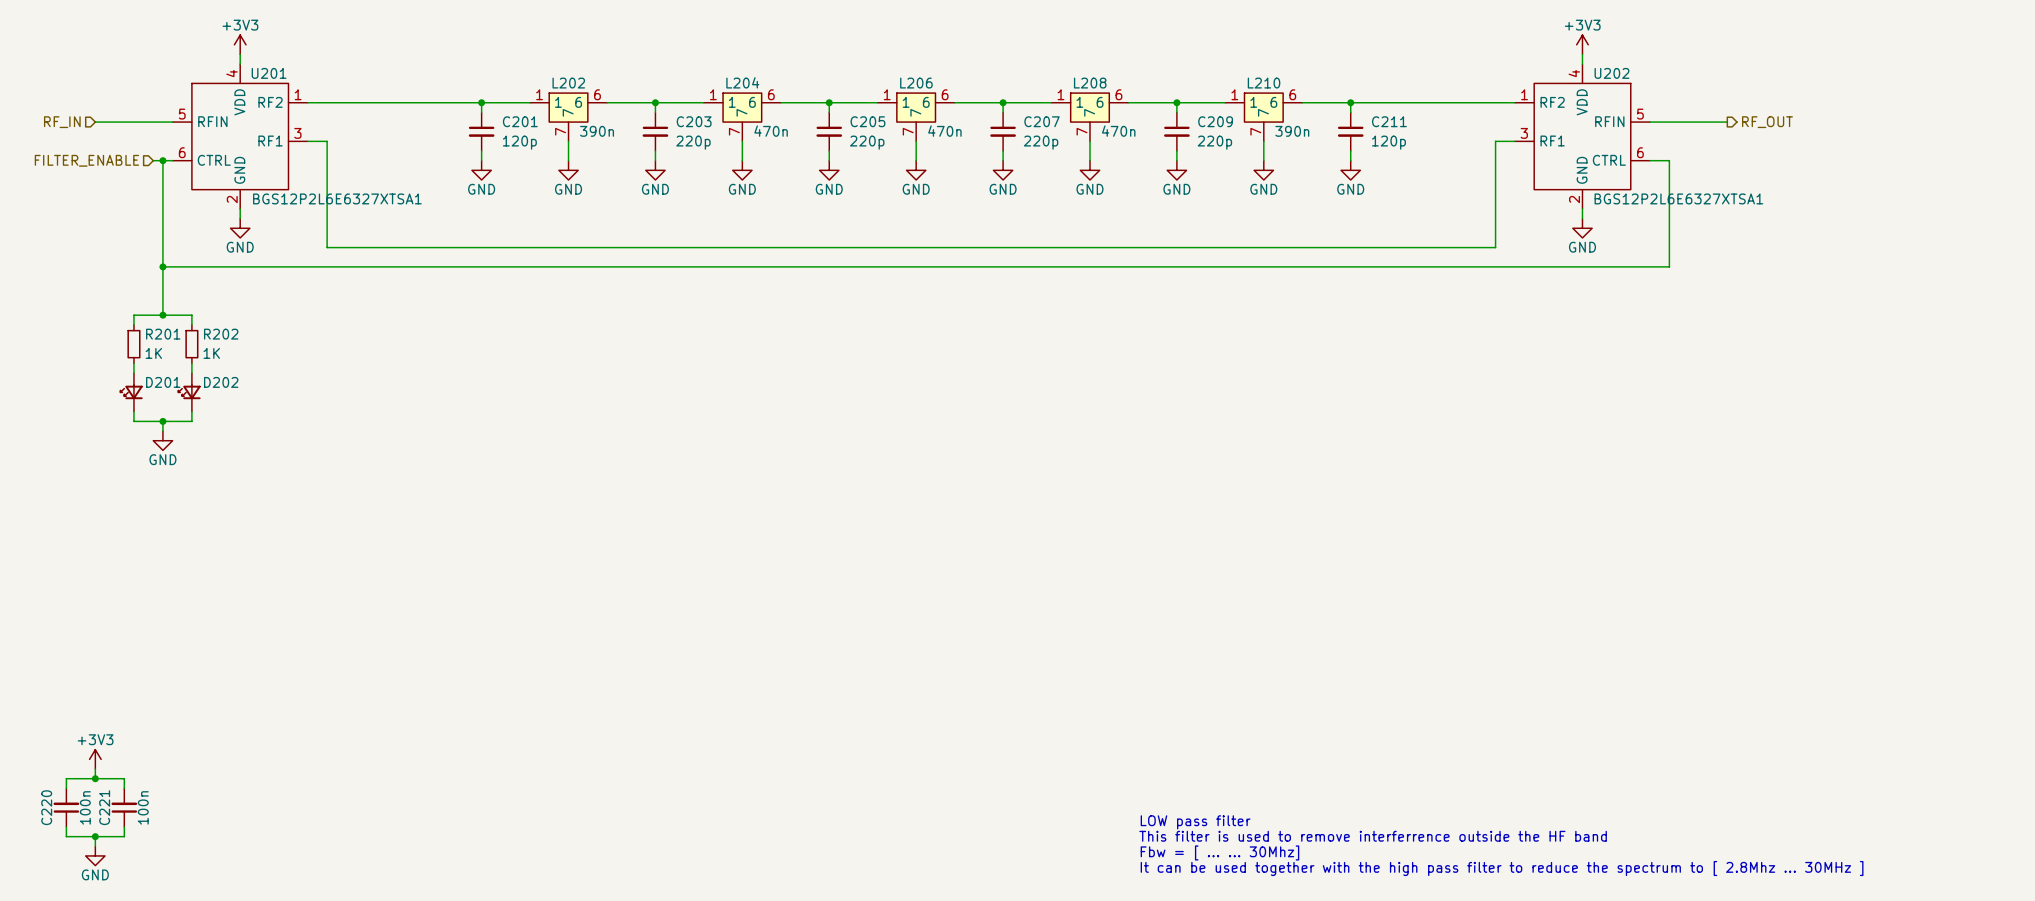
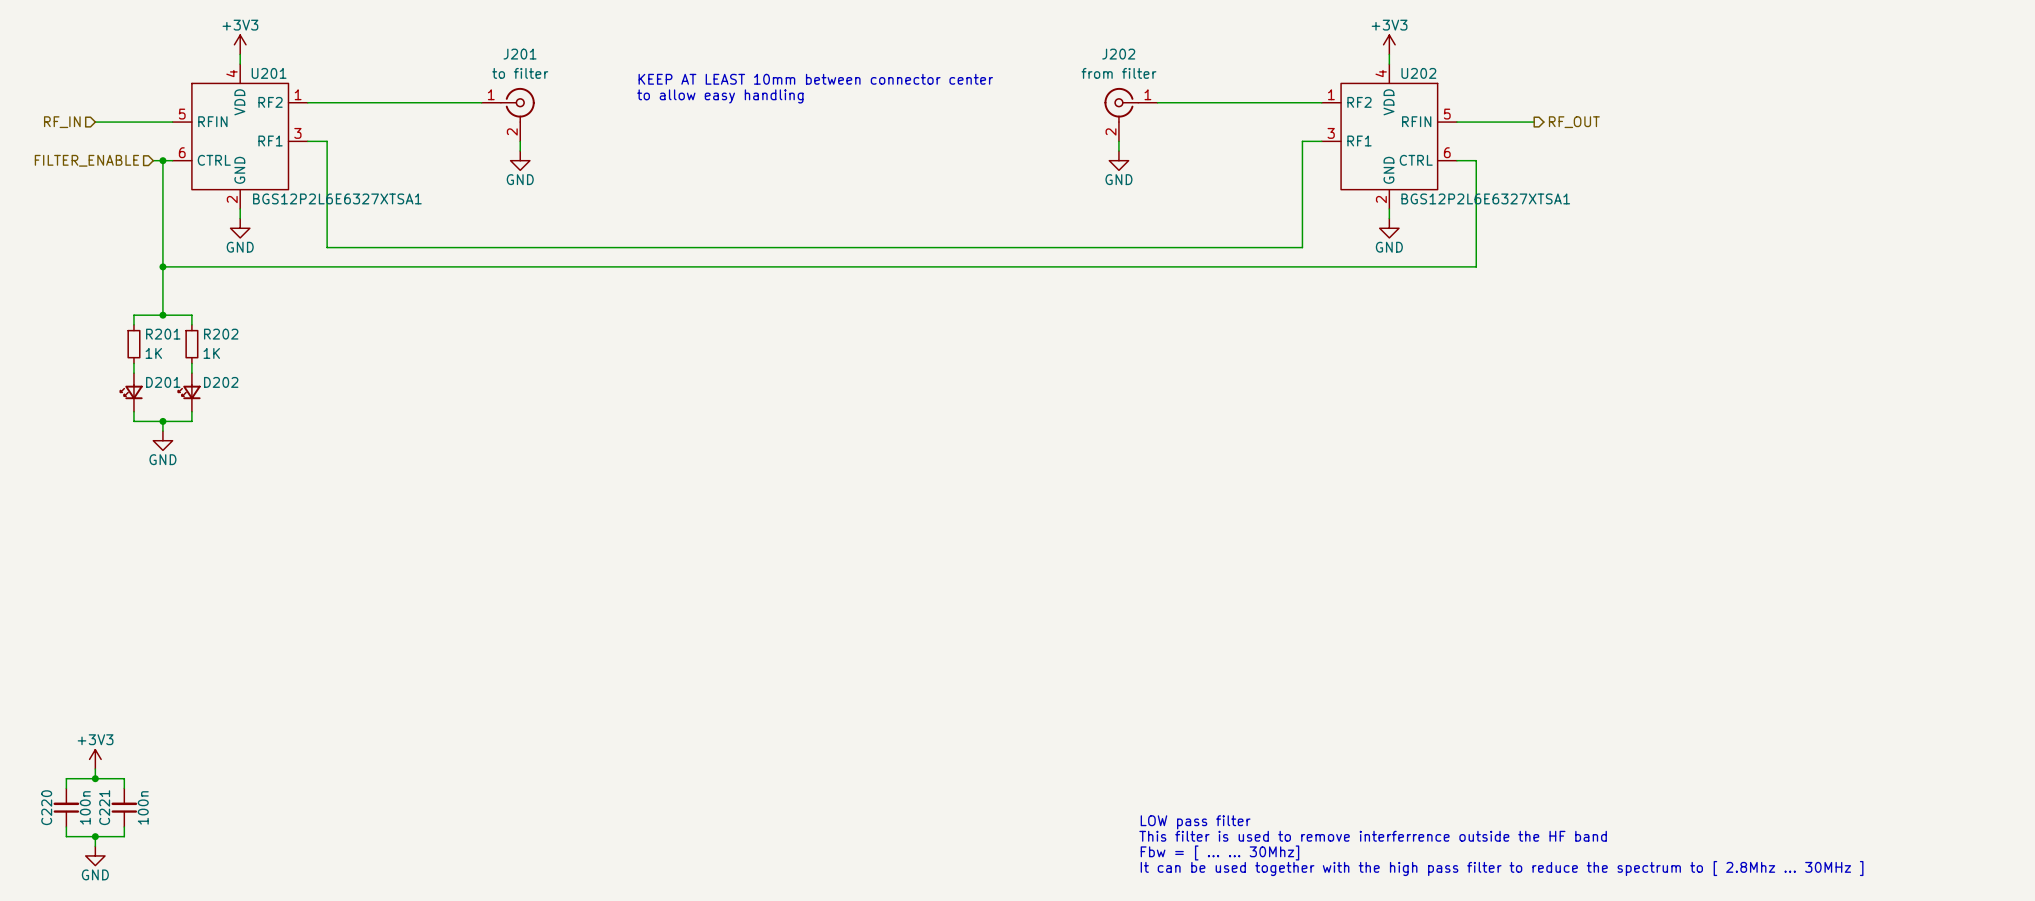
power symbol: none -> +3V3 (1389, 44)
power symbol: +3V3 (1582, 44) -> none
wire: (1582, 54) (1582, 64) -> none
text: none -> KEEP AT LEAST 10mm between connector center (815, 79)
text: none -> to allow easy handling (720, 96)
junction: (481, 102) -> none
wire: (607, 102) (703, 102) -> none
wire: (655, 102) (655, 112) -> none
junction: (655, 102) -> none
wire: (780, 102) (877, 102) -> none
wire: (829, 102) (829, 112) -> none
junction: (829, 102) -> none
wire: (954, 102) (1051, 102) -> none
wire: (1003, 102) (1003, 112) -> none
junction: (1003, 102) -> none
wire: (1176, 102) (1176, 112) -> none
junction: (1176, 102) -> none
wire: (1321, 102) (1514, 102) -> none
wire: (1350, 102) (1350, 112) -> (1389, 54) (1389, 64)
junction: (1350, 102) -> none
J201: none -> to filter (508, 114)
J202: none -> from filter (1131, 114)
L202: 390n (568, 117) -> none
L204: 470n (742, 117) -> none
L206: 470n (916, 117) -> none
L208: 470n (1089, 117) -> none
L210: 390n (1263, 117) -> none
wire: none -> (1456, 122) (1534, 122)
hierarchical label: none -> RF_OUT (1574, 122)
wire: (1650, 122) (1727, 122) -> none
hierarchical label: RF_OUT (1767, 122) -> none
C201: 120p (481, 131) -> none
C203: 220p (655, 131) -> none
C205: 220p (829, 131) -> none
C207: 220p (1003, 131) -> none
C209: 220p (1176, 131) -> none
C211: 120p (1350, 131) -> none
U202 position: (1582, 136) -> (1389, 136)
wire: (568, 141) (568, 160) -> none
wire: (742, 141) (742, 160) -> none
wire: (916, 141) (916, 160) -> none
wire: (1089, 141) (1089, 160) -> none
wire: (1263, 141) (1263, 160) -> none
wire: (1514, 141) (1495, 141) (1495, 247) (1302, 247) -> (1321, 141) (1302, 141) (1302, 247)
wire: (481, 151) (481, 160) -> (520, 141) (520, 151)
wire: (655, 151) (655, 160) -> none
wire: (829, 151) (829, 160) -> none
wire: (1003, 151) (1003, 160) -> none
wire: (1176, 151) (1176, 160) -> (1118, 141) (1118, 151)
wire: (1350, 151) (1350, 160) -> (1389, 208) (1389, 218)
power symbol: none -> GND (520, 160)
power symbol: none -> GND (1118, 160)
wire: (1650, 160) (1669, 160) (1669, 266) (1476, 266) -> (1456, 160) (1476, 160) (1476, 266)
power symbol: GND (481, 170) -> none
power symbol: GND (568, 170) -> none
power symbol: GND (655, 170) -> none
power symbol: GND (742, 170) -> none
power symbol: GND (829, 170) -> none
power symbol: GND (916, 170) -> none
power symbol: GND (1003, 170) -> none
power symbol: GND (1089, 170) -> none
power symbol: GND (1176, 170) -> none
power symbol: GND (1263, 170) -> none
power symbol: GND (1350, 170) -> none
wire: (1582, 208) (1582, 218) -> none
power symbol: none -> GND (1389, 228)
power symbol: GND (1582, 228) -> none

